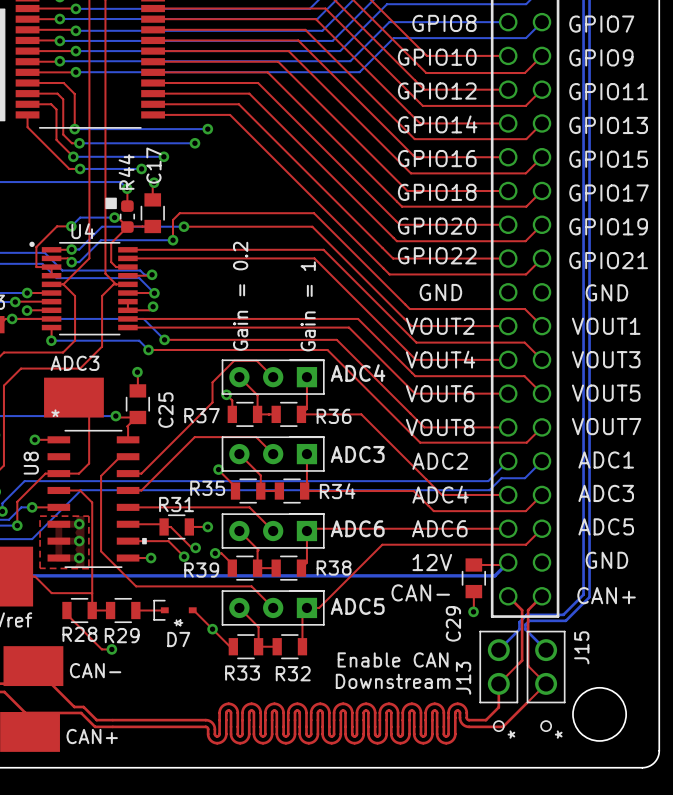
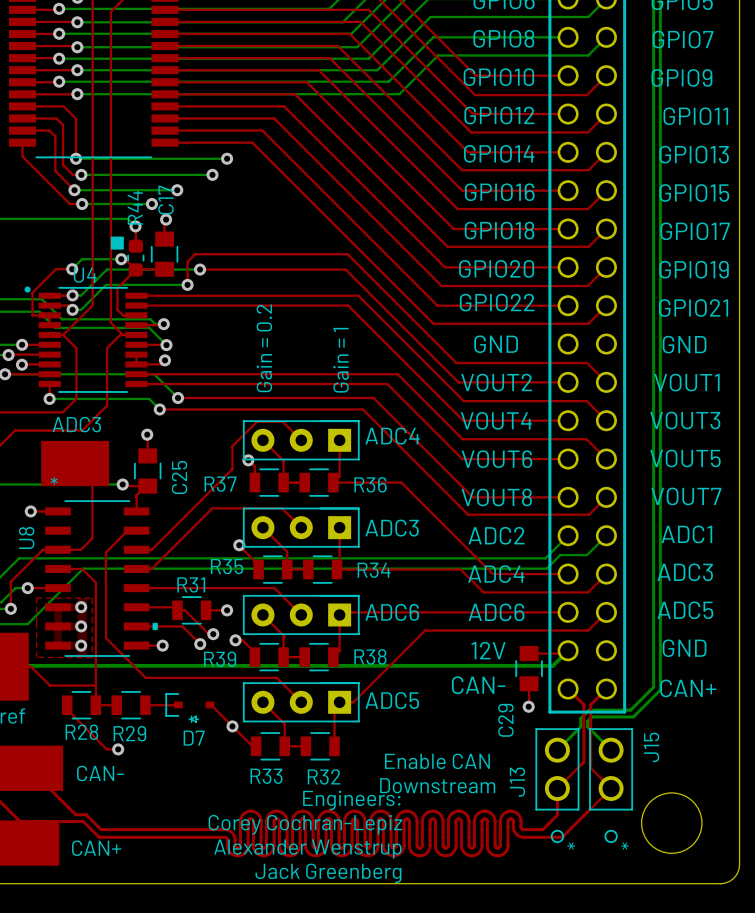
text: none -> Engineers: (351, 800)
text: none -> Corey Cochran-Lepiz (305, 824)
text: none -> Alexander Wenstrup (307, 849)
text: none -> Jack Greenberg (328, 873)

